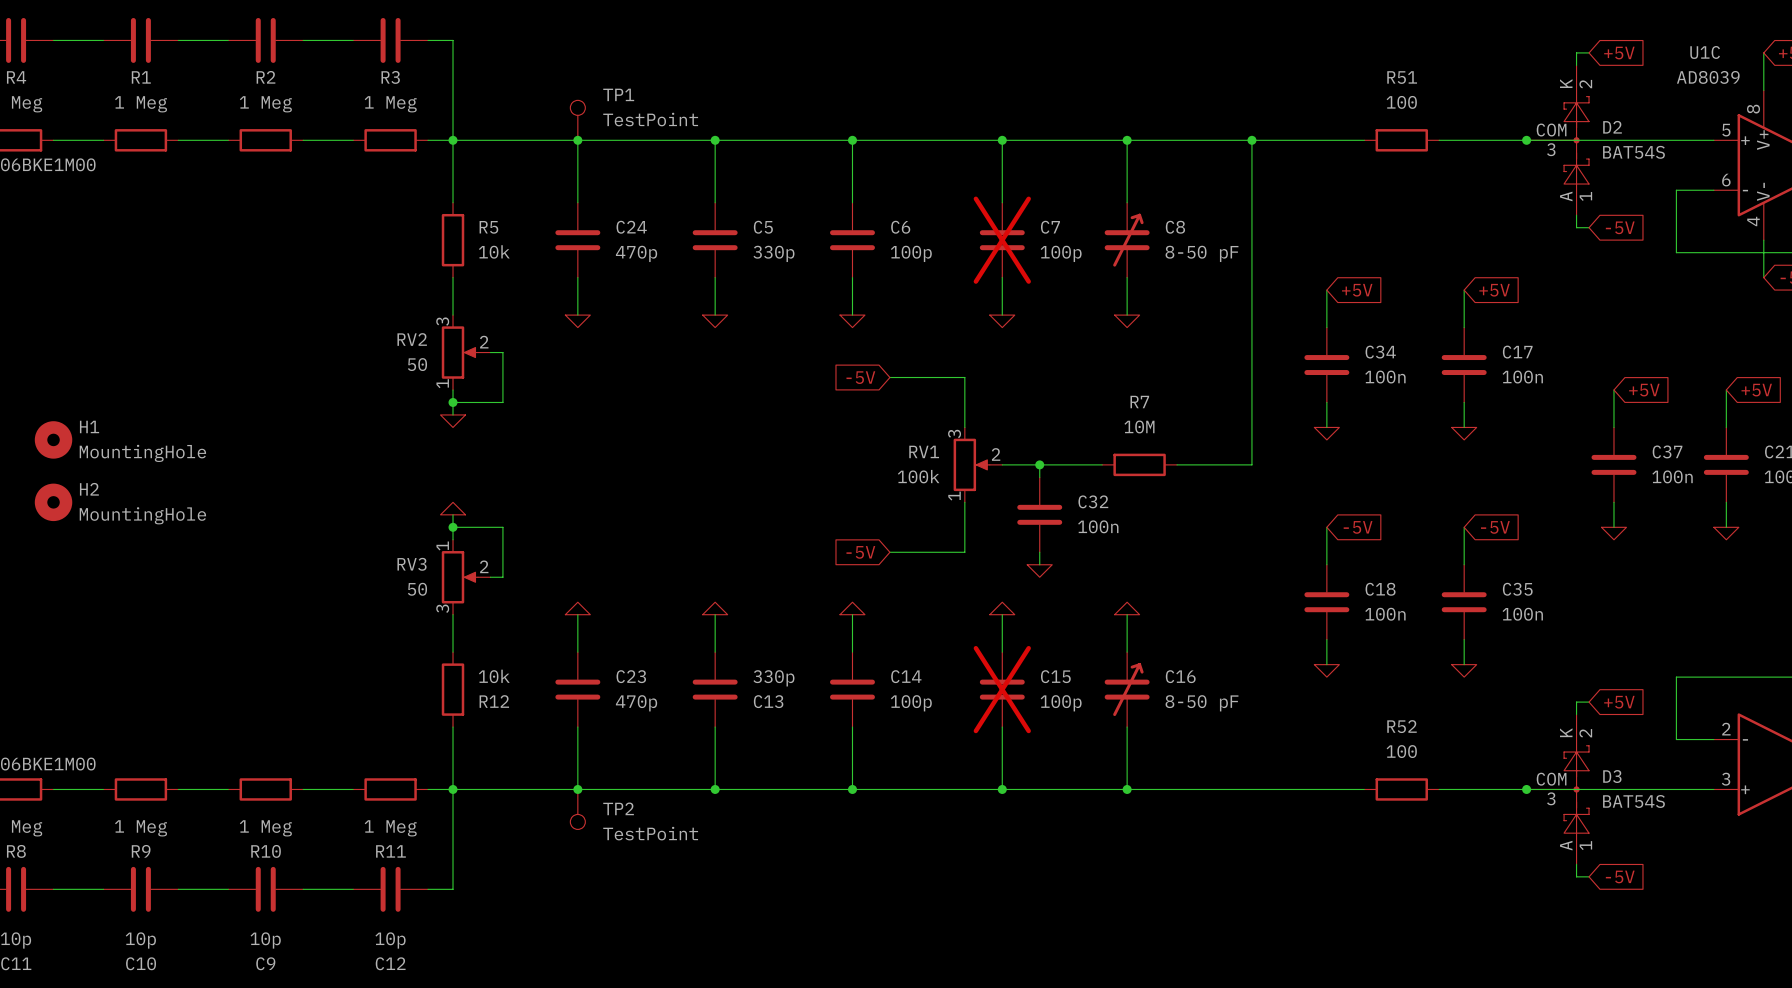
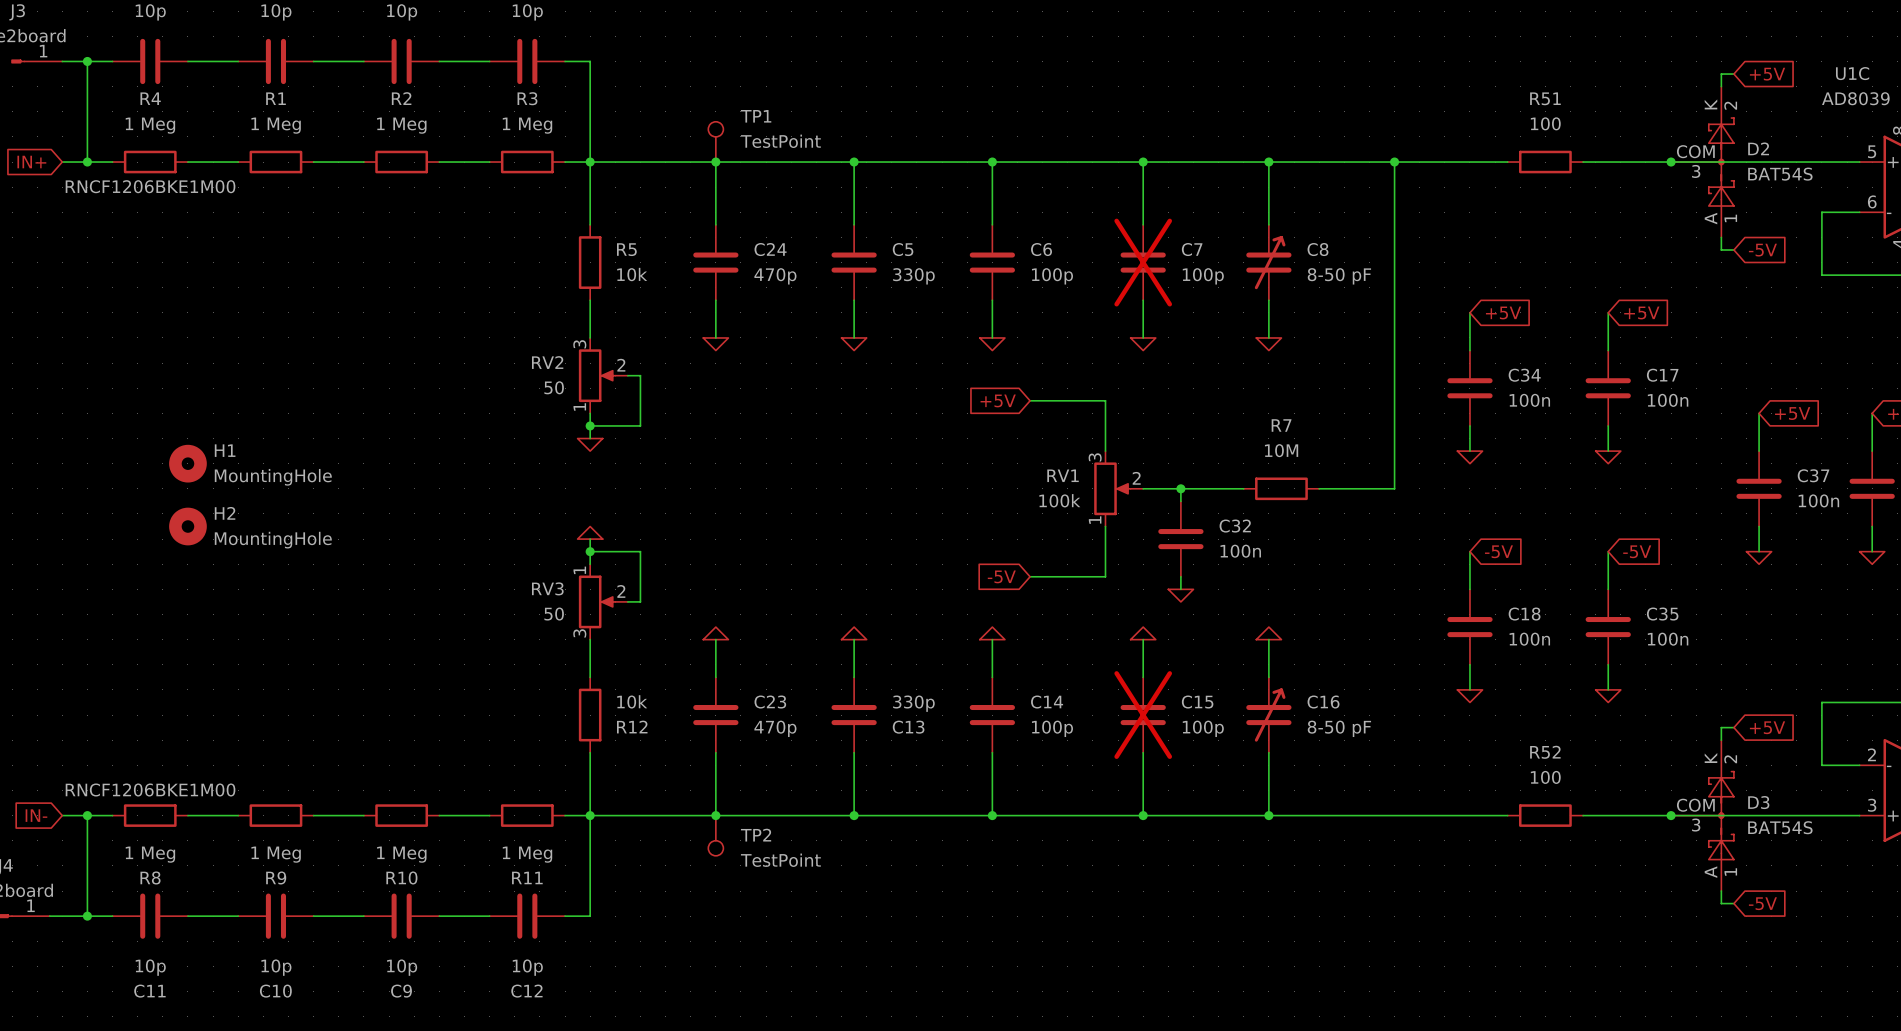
global label: -5V (860, 377) -> +5V (998, 400)

